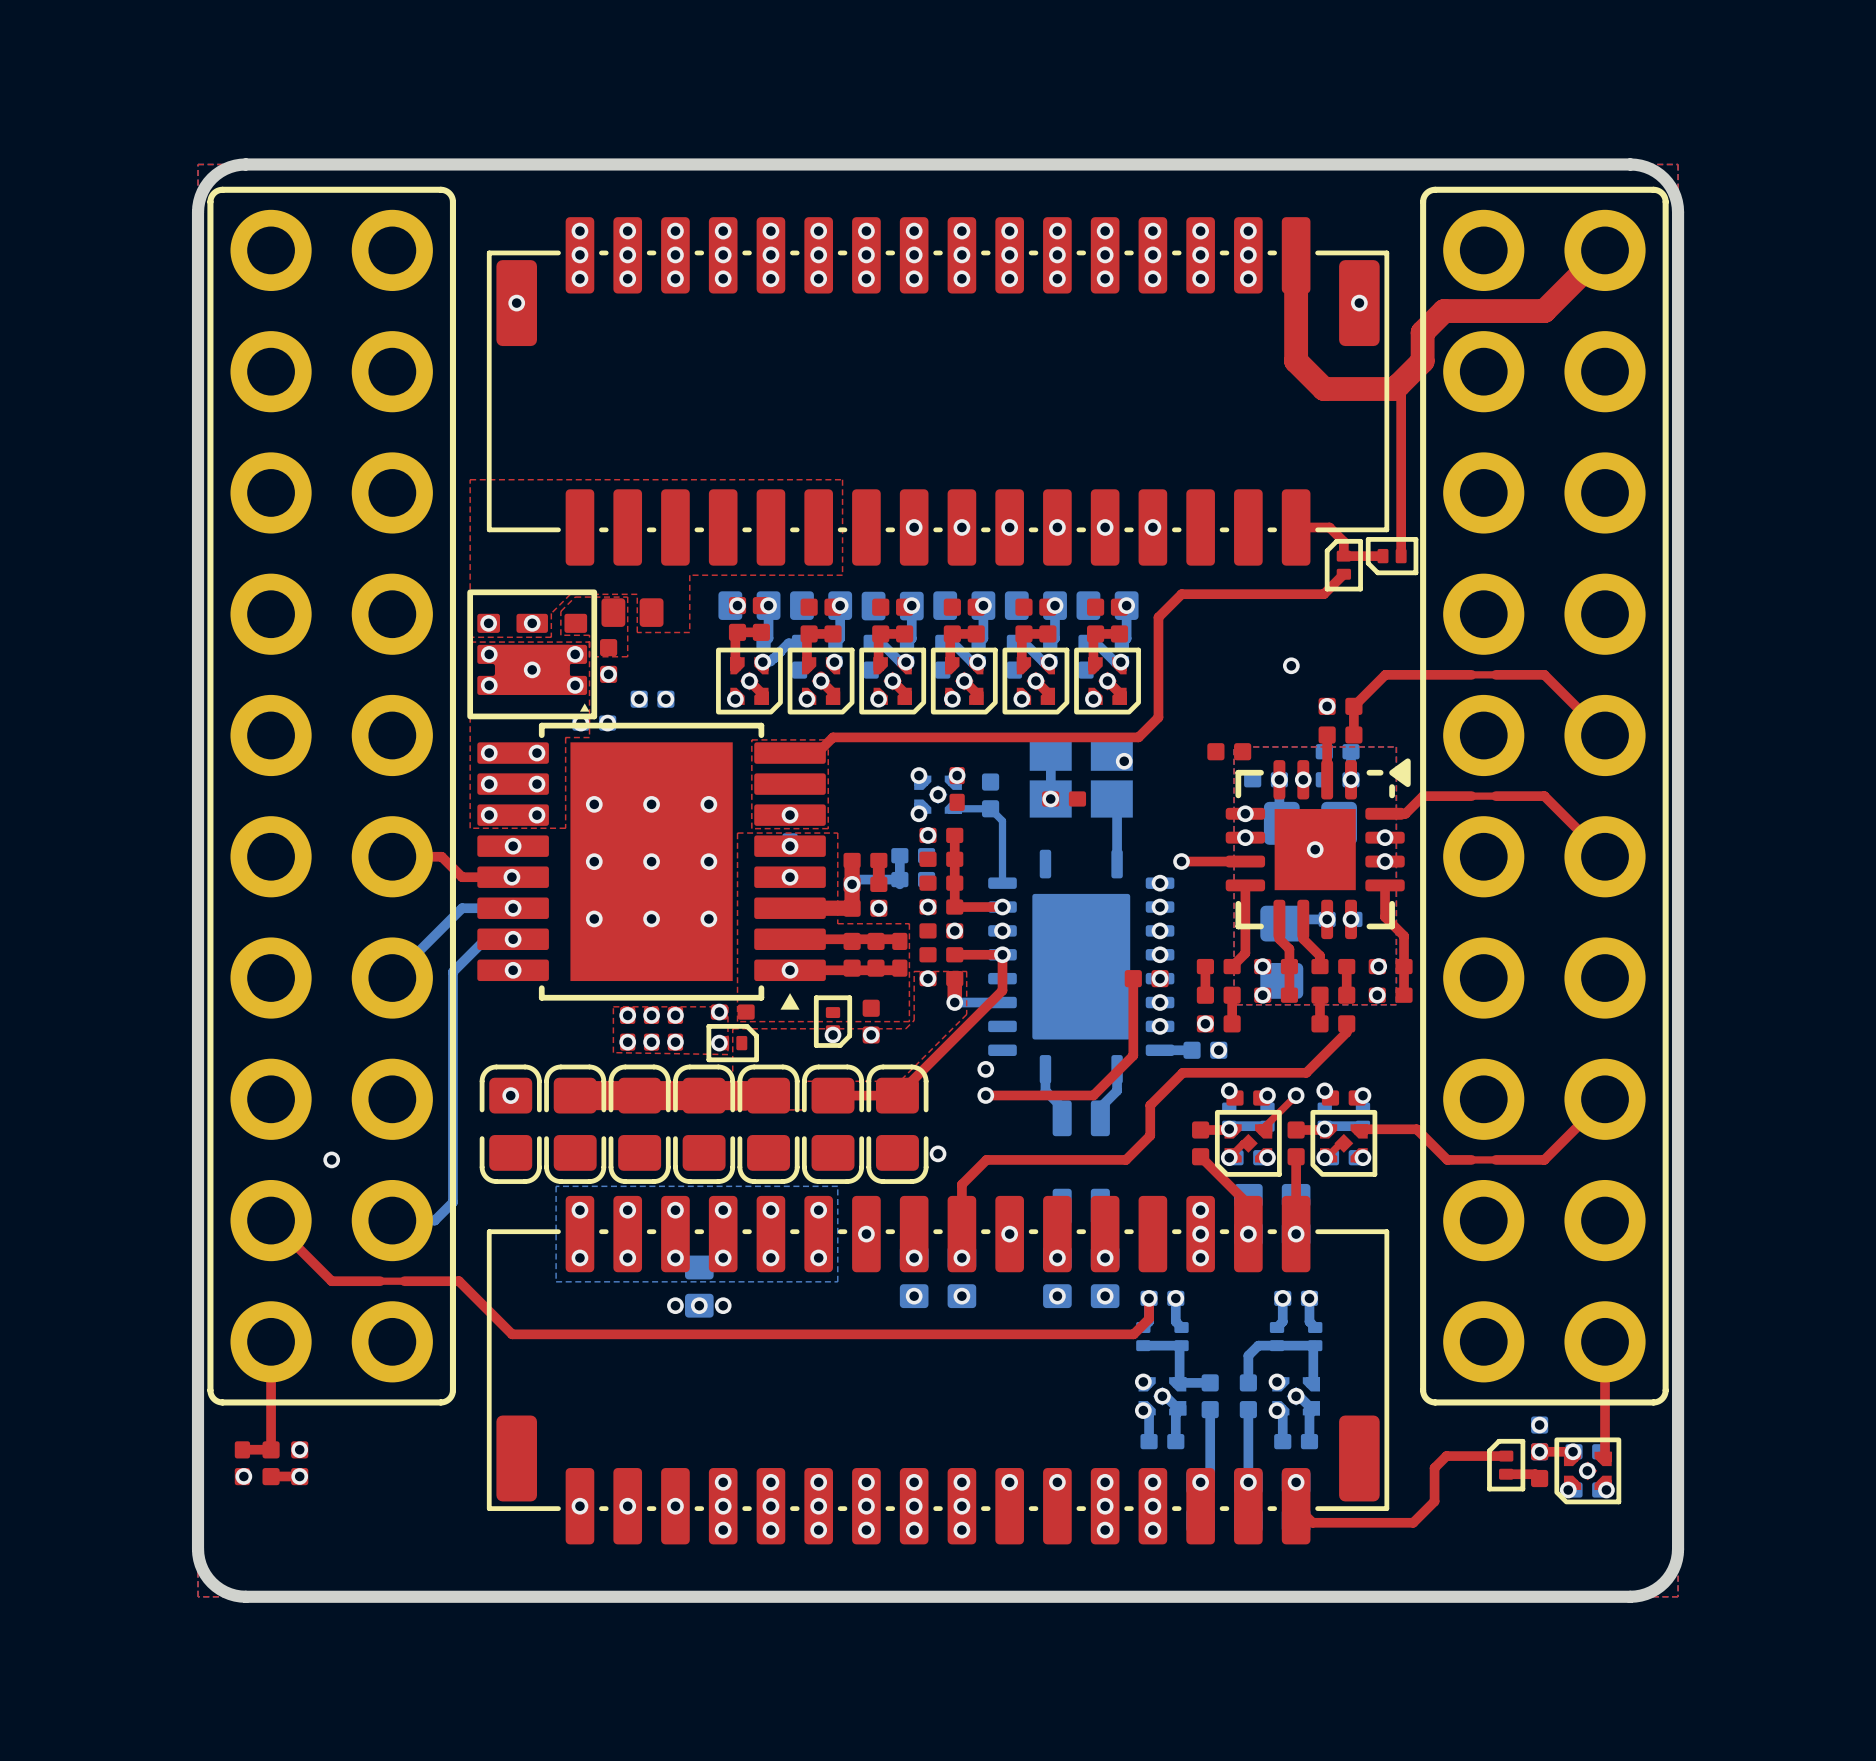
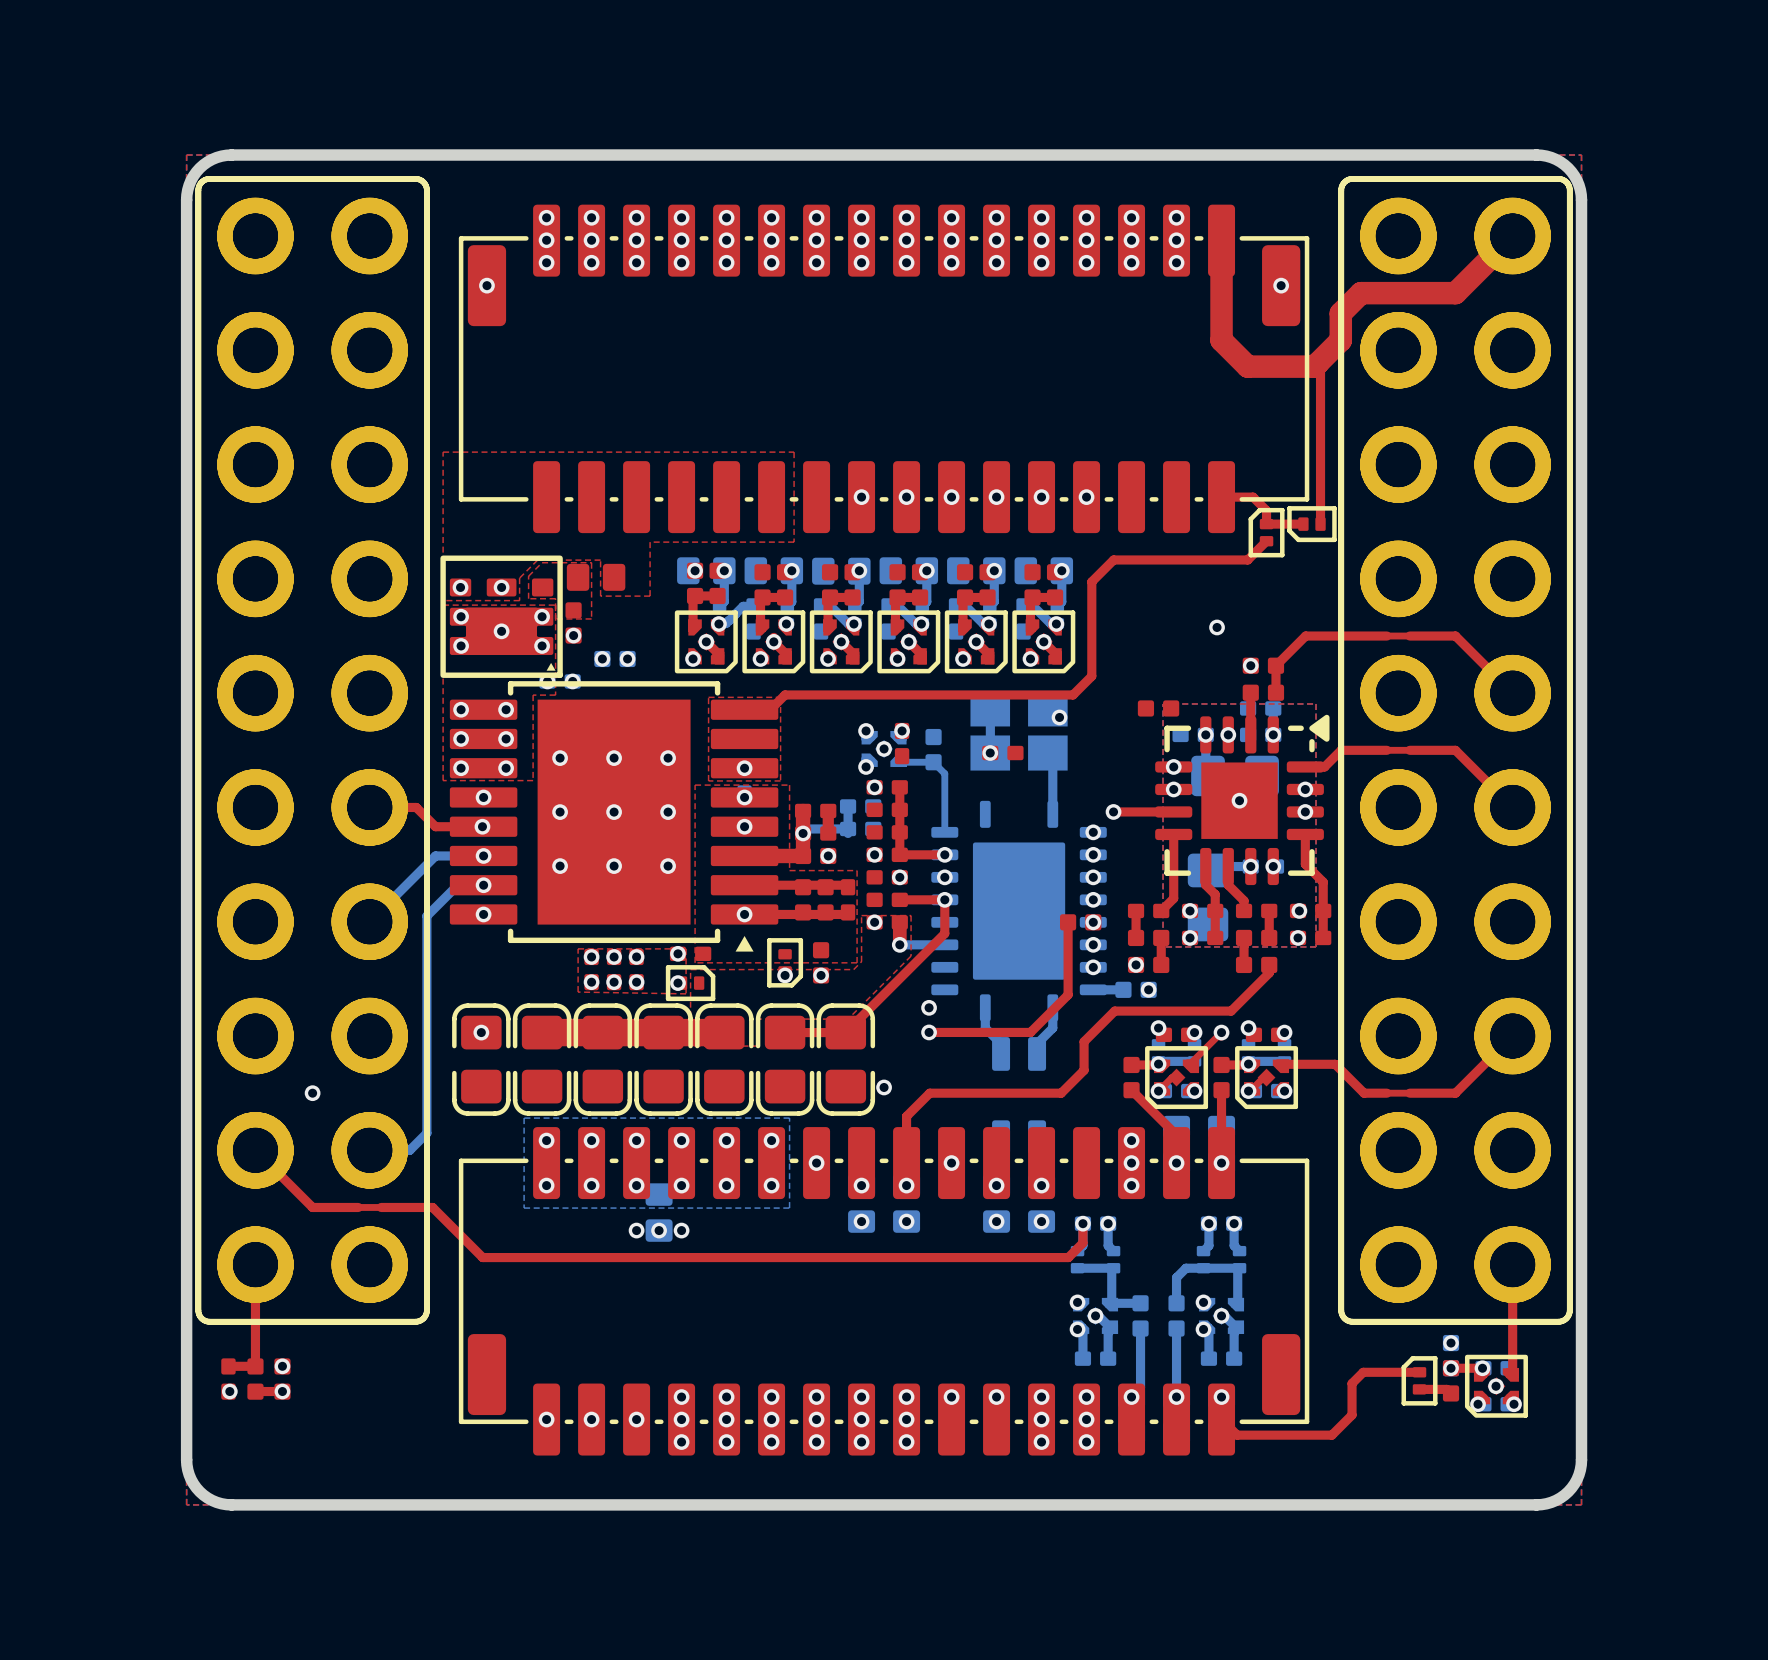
board edge: (245, 164) (1630, 164) (1651, 169) (1664, 178) (1673, 191) (1678, 212) (1678, 1549) (1673, 1569) (1664, 1582) (1651, 1592) (1630, 1596) (245, 1596) (229, 1594) (212, 1582) (200, 1564) (198, 1549) (198, 212) (200, 196) (212, 178) (225, 169) (245, 164) -> none
part: none -> (884, 829)

